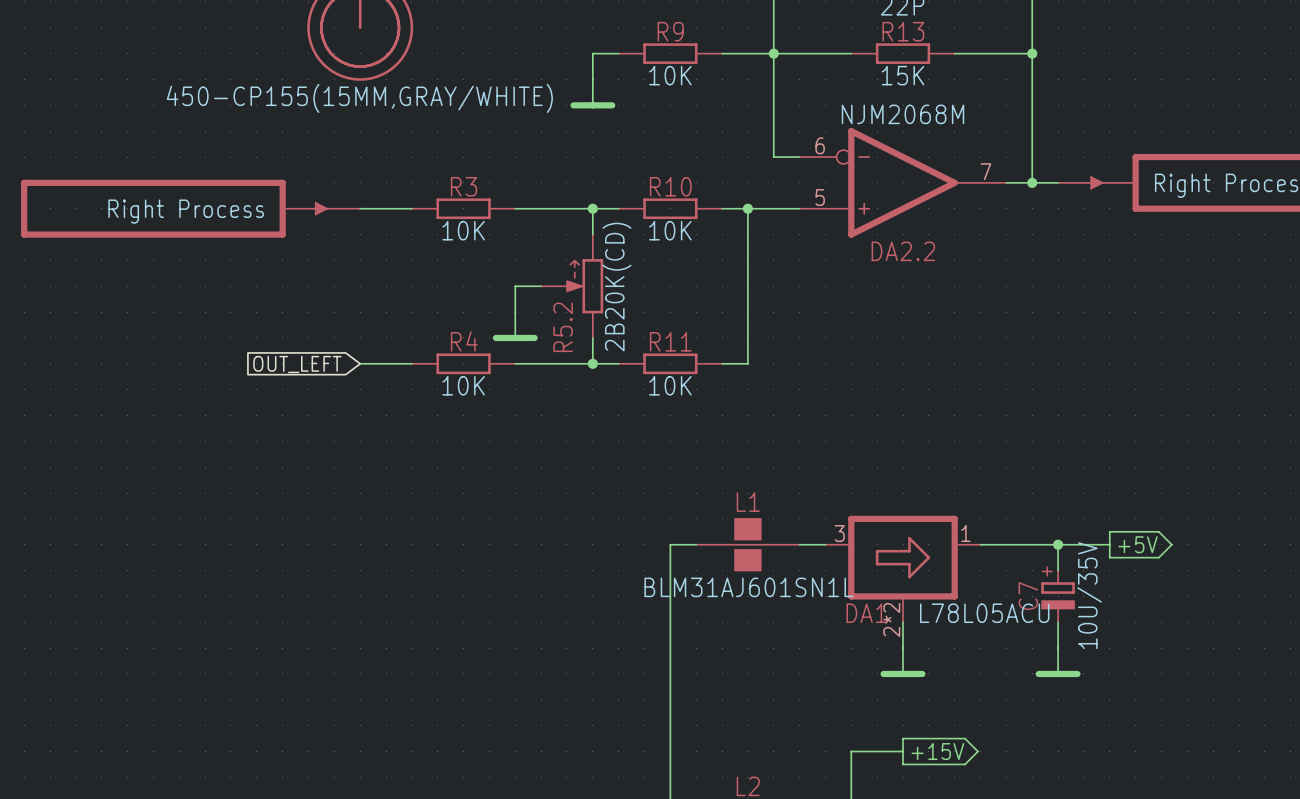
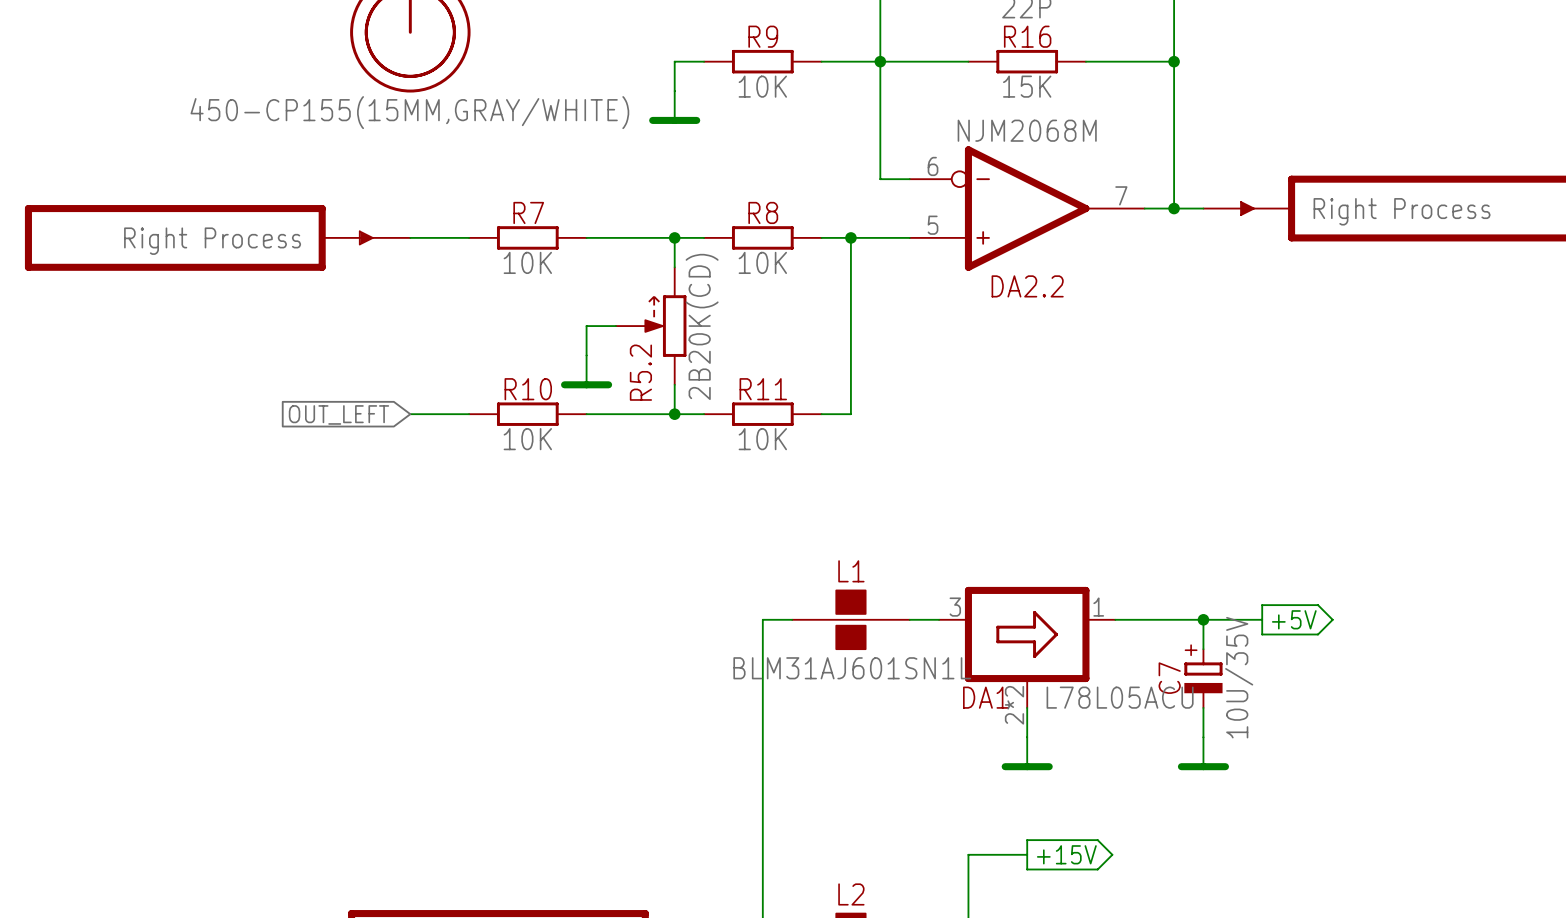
R13 name: R13 (903, 31) -> R16 (1027, 36)
R3 name: R3 (463, 186) -> R7 (528, 212)
R10 name: R10 (670, 186) -> R8 (763, 212)
R4 name: R4 (464, 341) -> R10 (528, 389)

